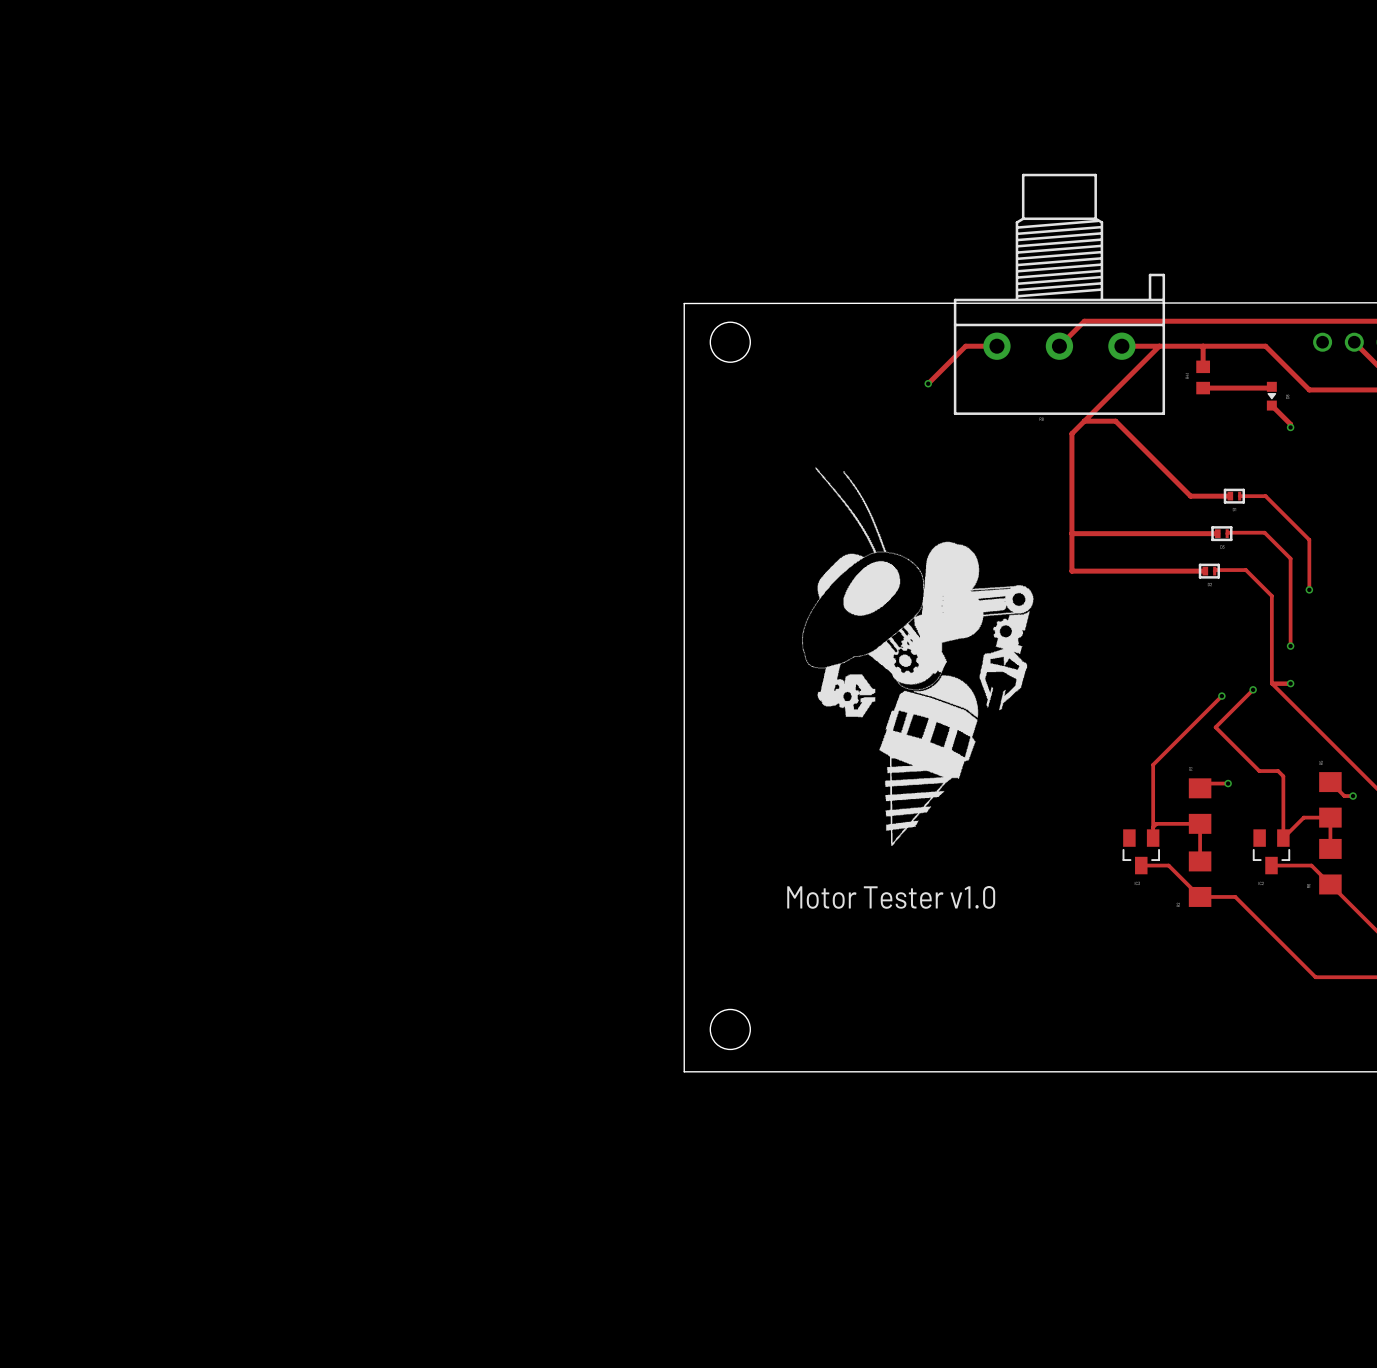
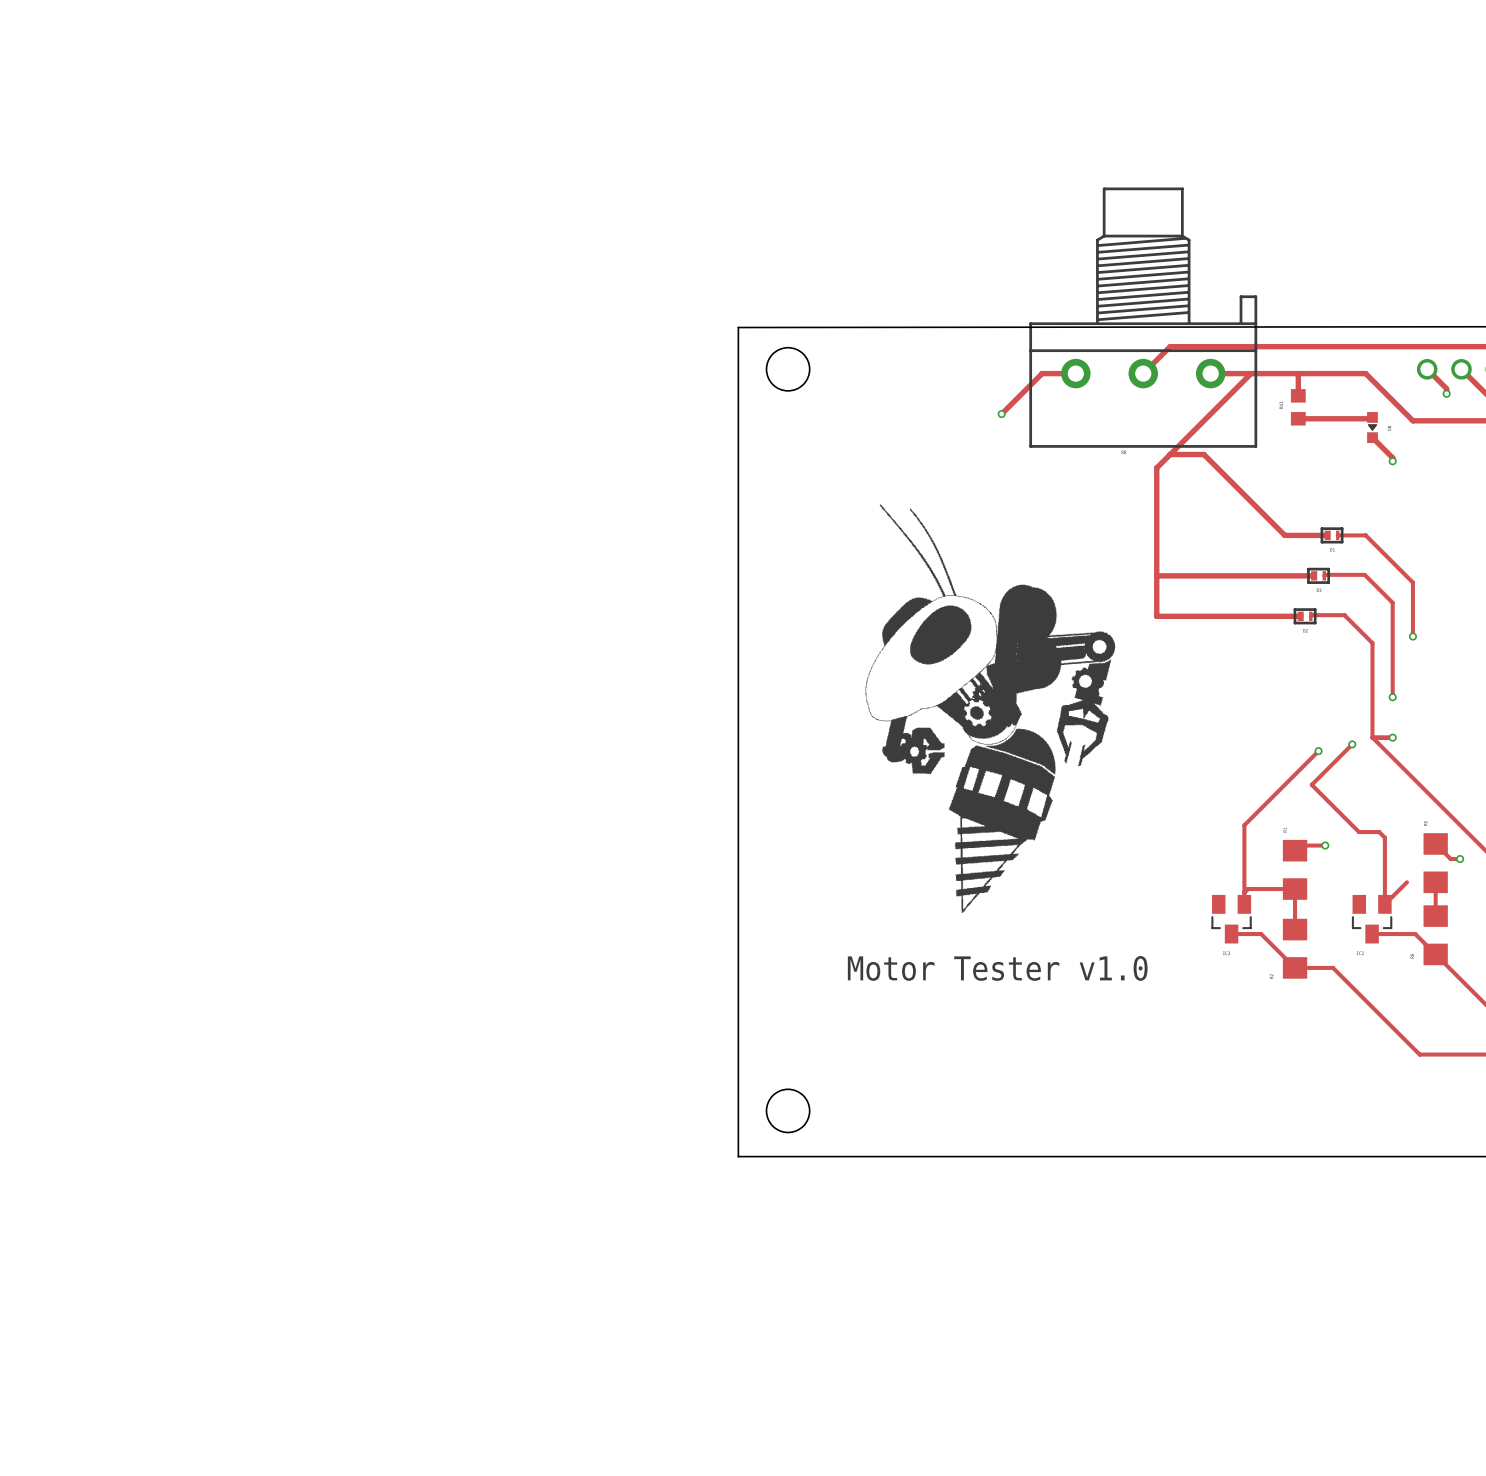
track: none -> (1427, 369) (1446, 388) (1446, 393)
via: none -> (1446, 393)
track: (1303, 817) (1330, 817) -> none

